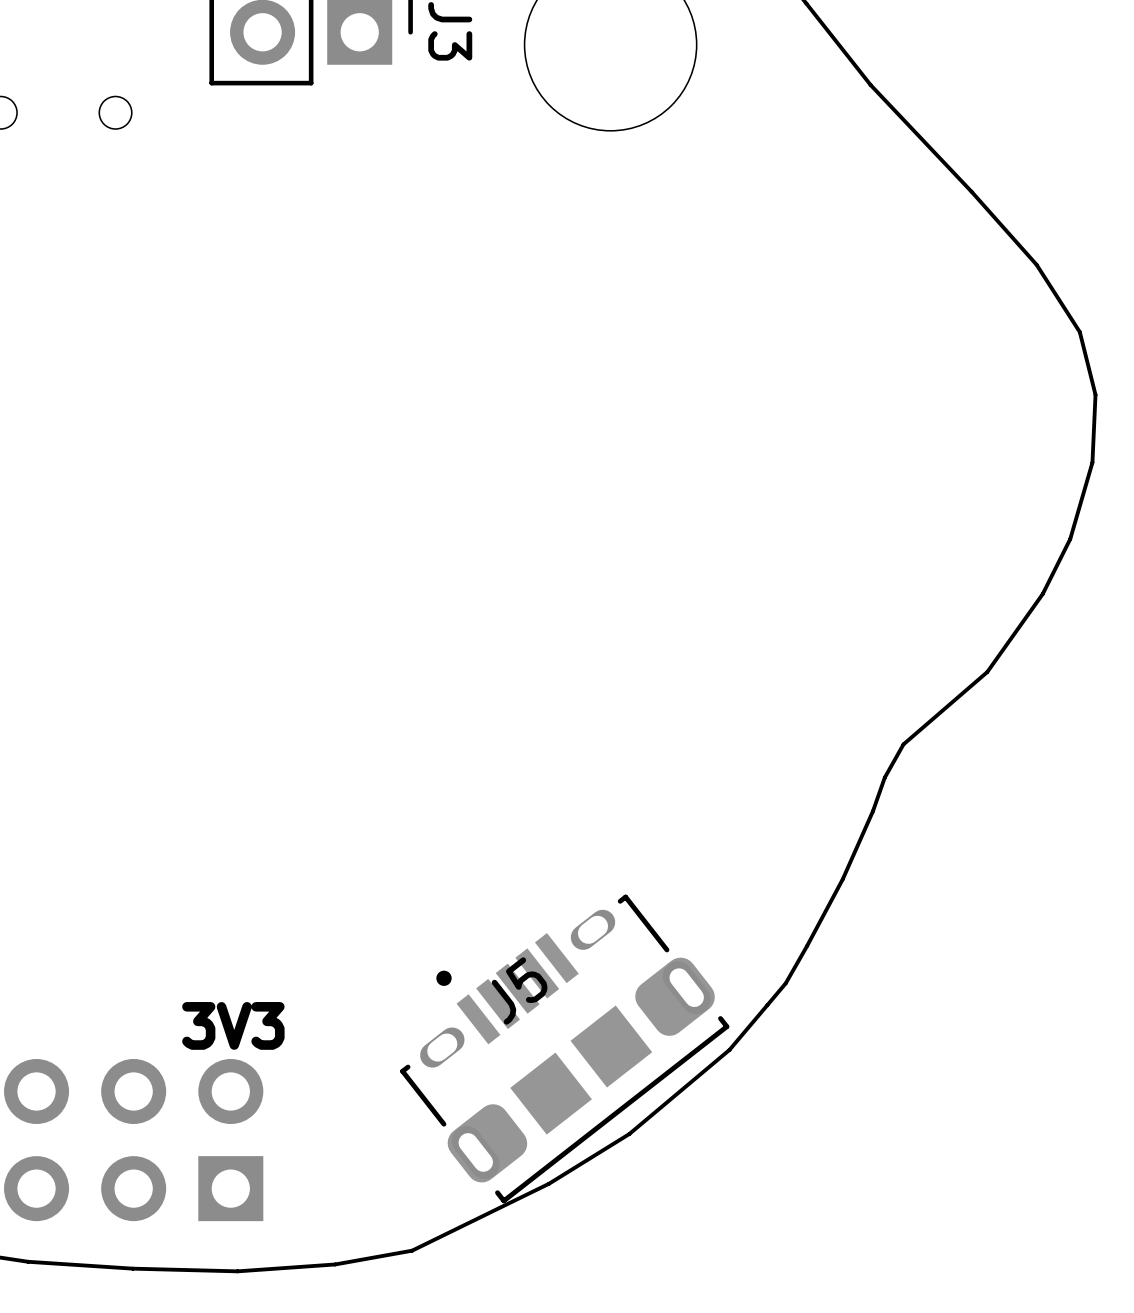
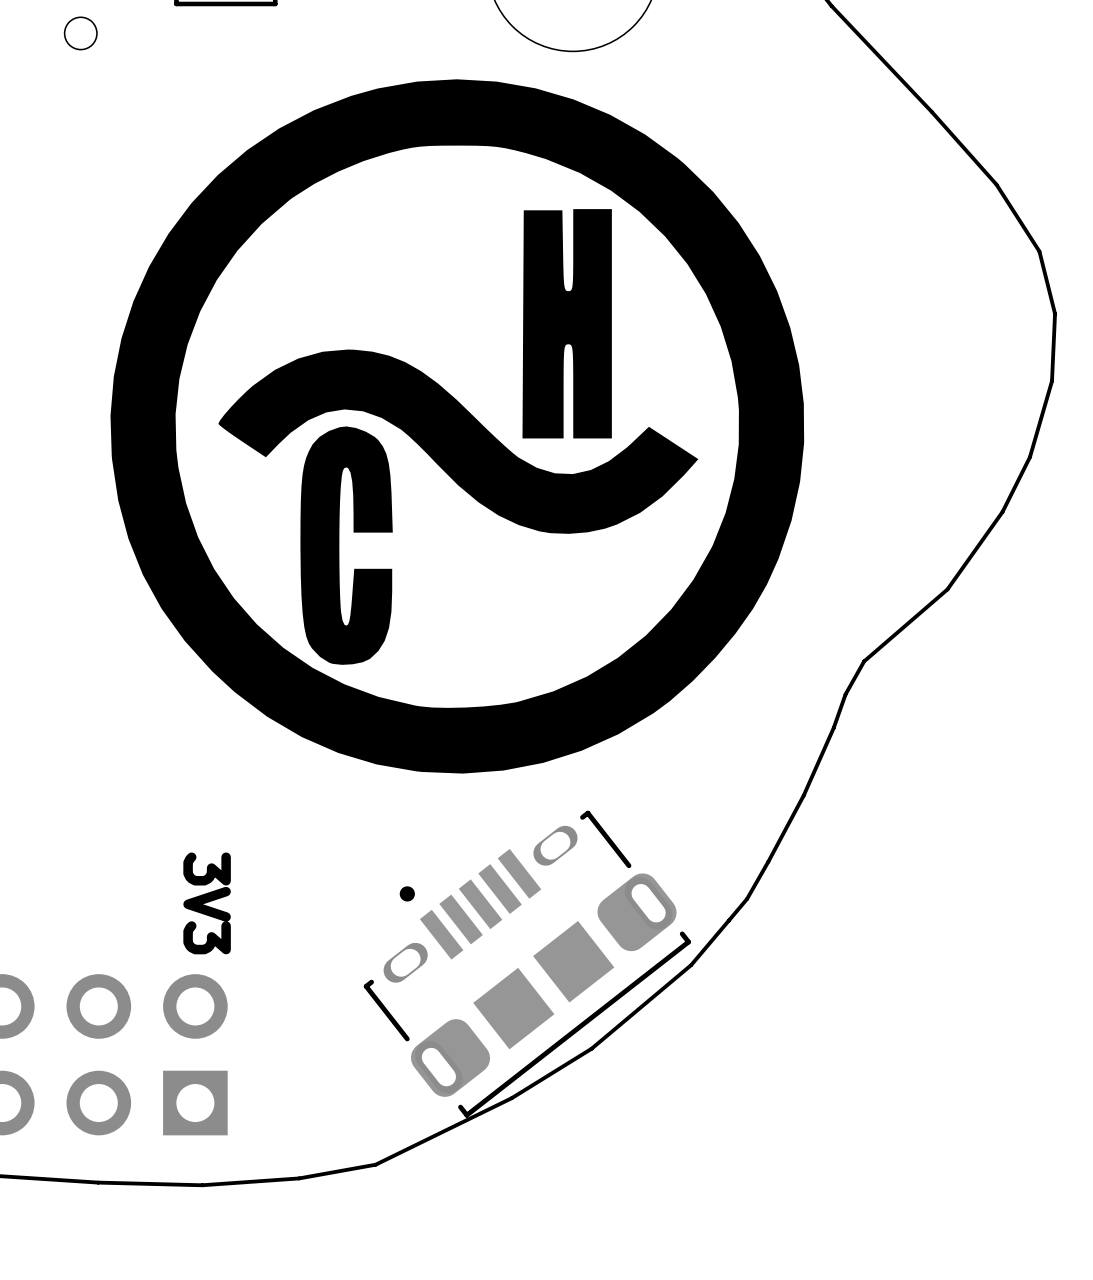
drawing: none -> [110, 79, 805, 774]
J5 name: J5 (519, 991) -> none
text rotation: 0° (233, 1025) -> 90° clockwise (207, 903)

